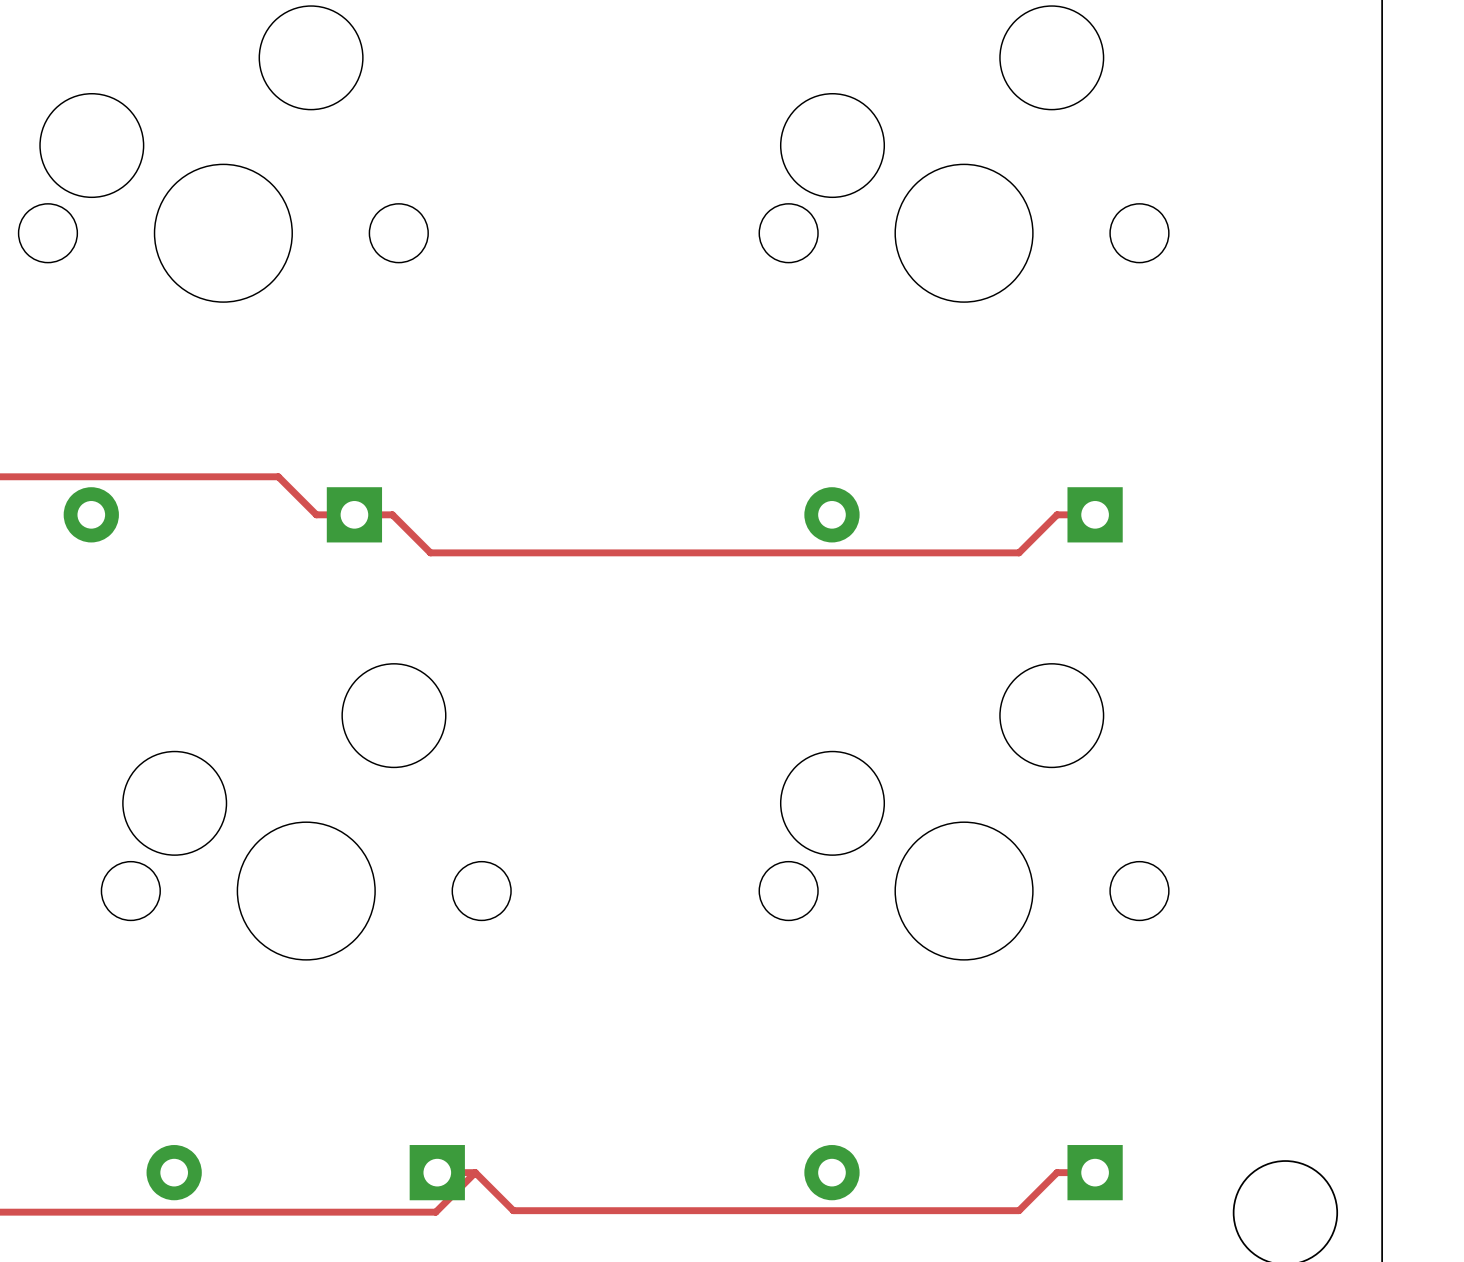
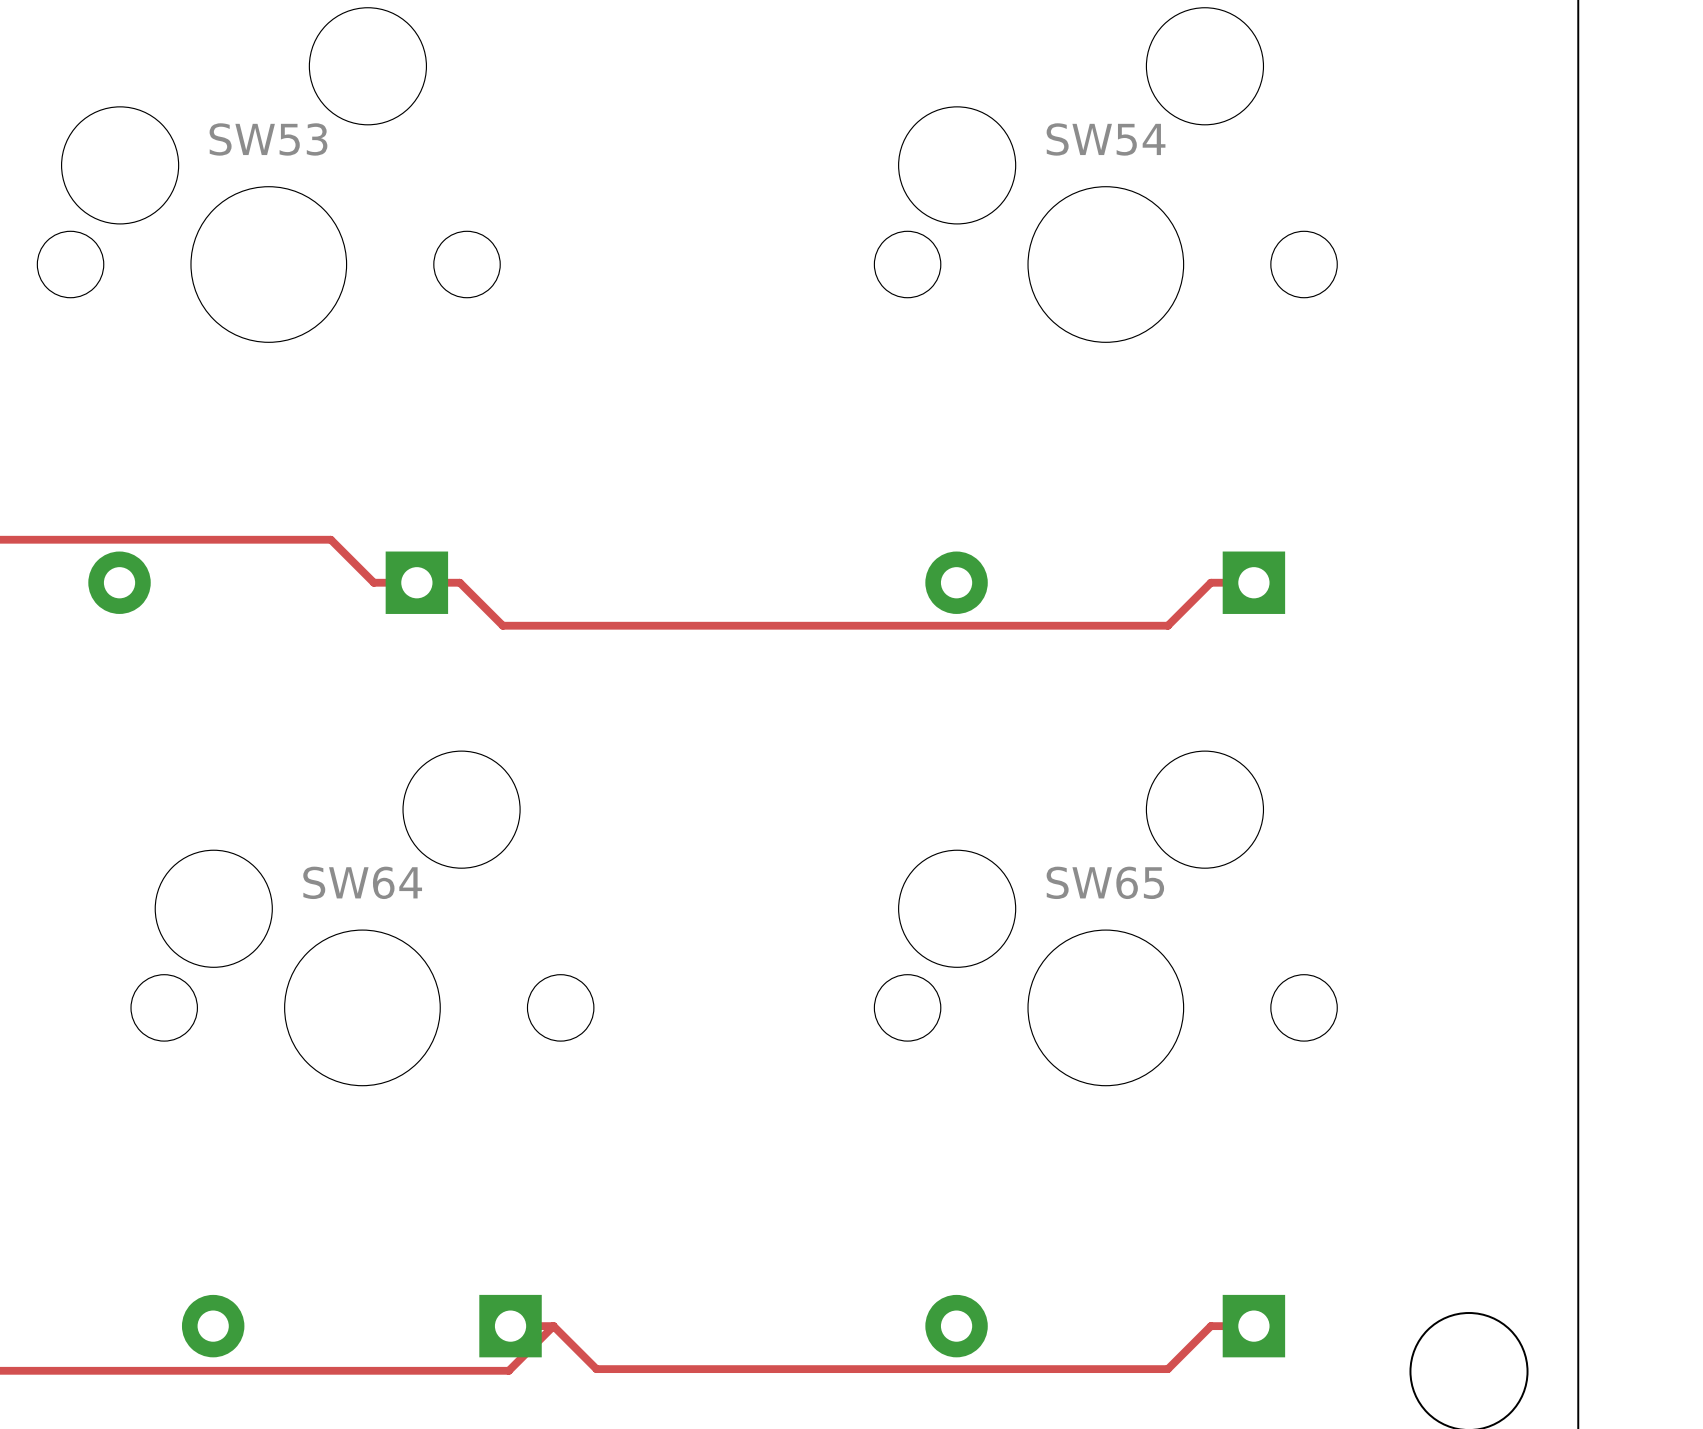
SW53 name: none -> SW53 (268, 139)
SW54 name: none -> SW54 (1106, 139)
SW64 name: none -> SW64 (362, 882)
SW65 name: none -> SW65 (1105, 882)

